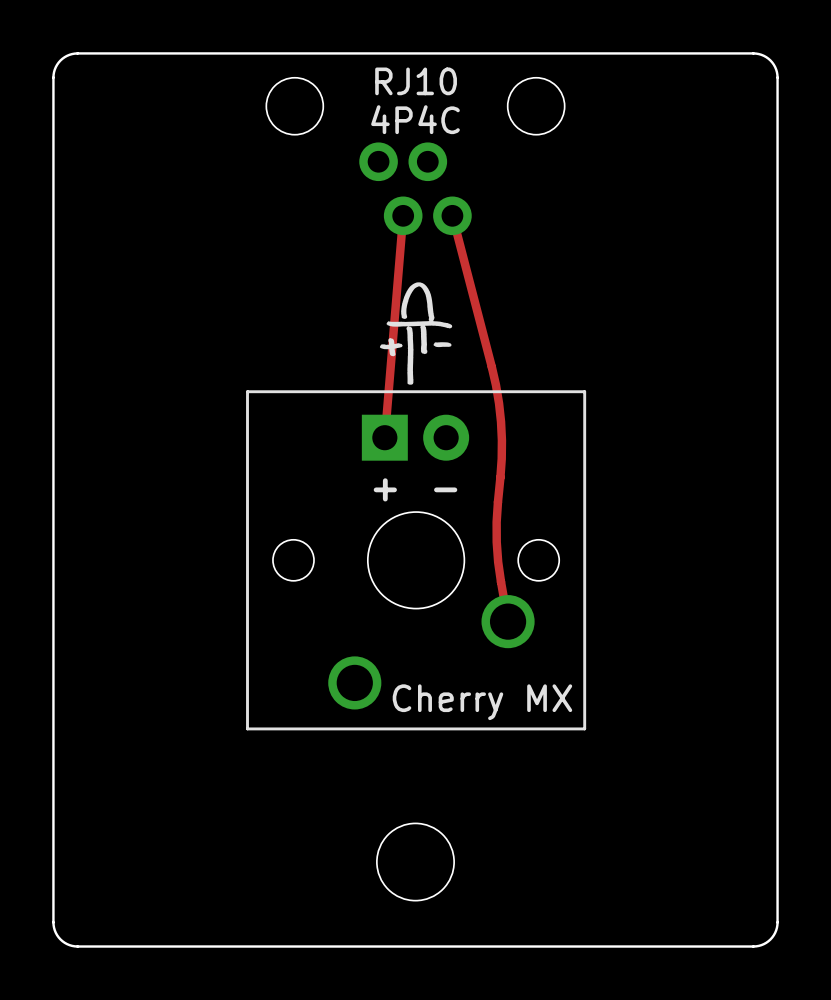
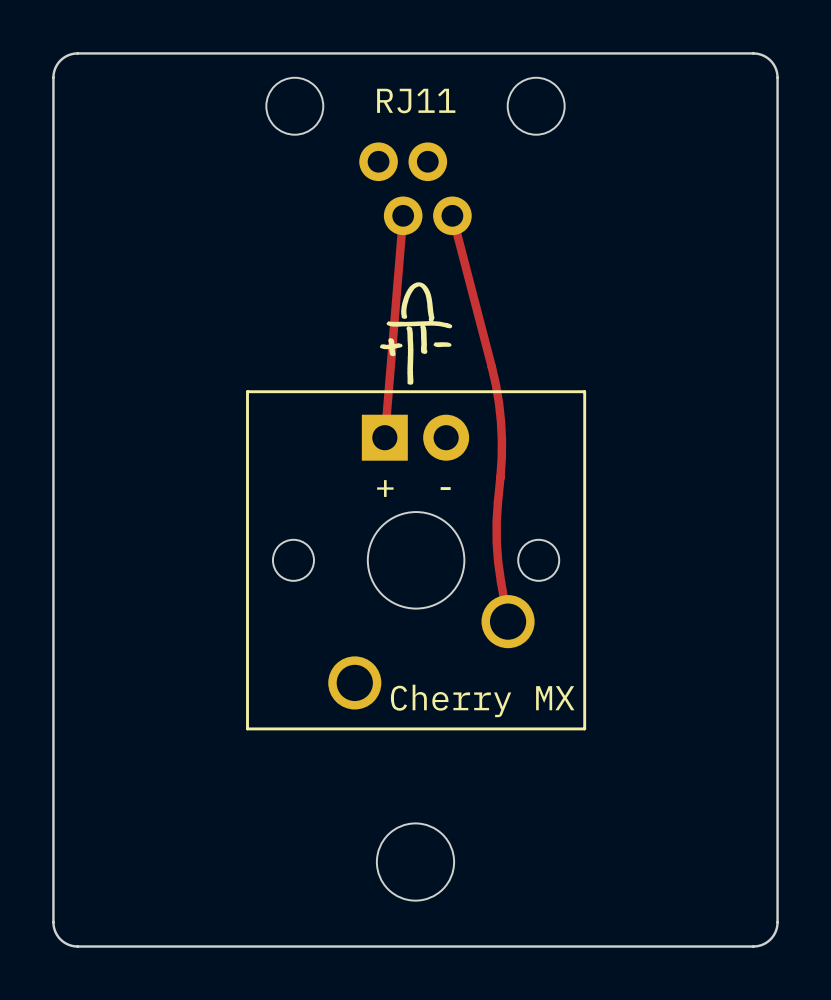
text: RJ10 (416, 81) -> RJ11 (416, 101)
text: 4P4C (415, 119) -> none

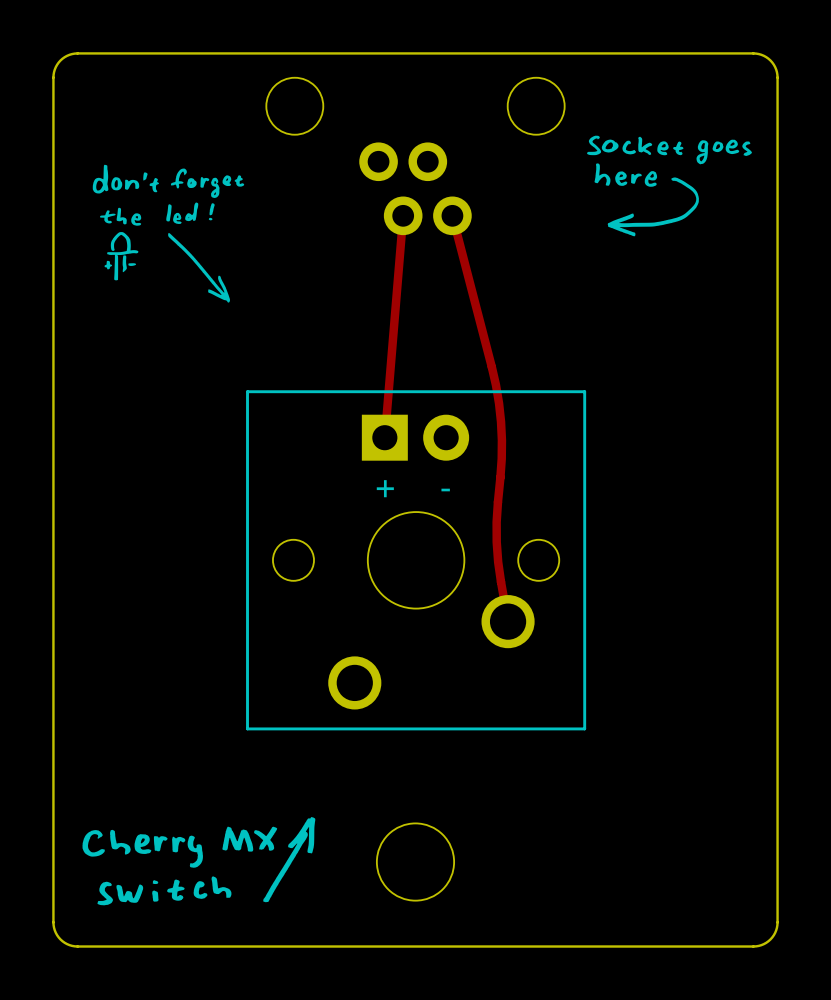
text: RJ11 (416, 101) -> none
drawing: none -> [587, 135, 752, 238]
drawing: none -> [92, 164, 245, 303]
drawing: [379, 282, 453, 385] -> none
text: Cherry MX (482, 700) -> none
drawing: none -> [82, 817, 316, 906]

